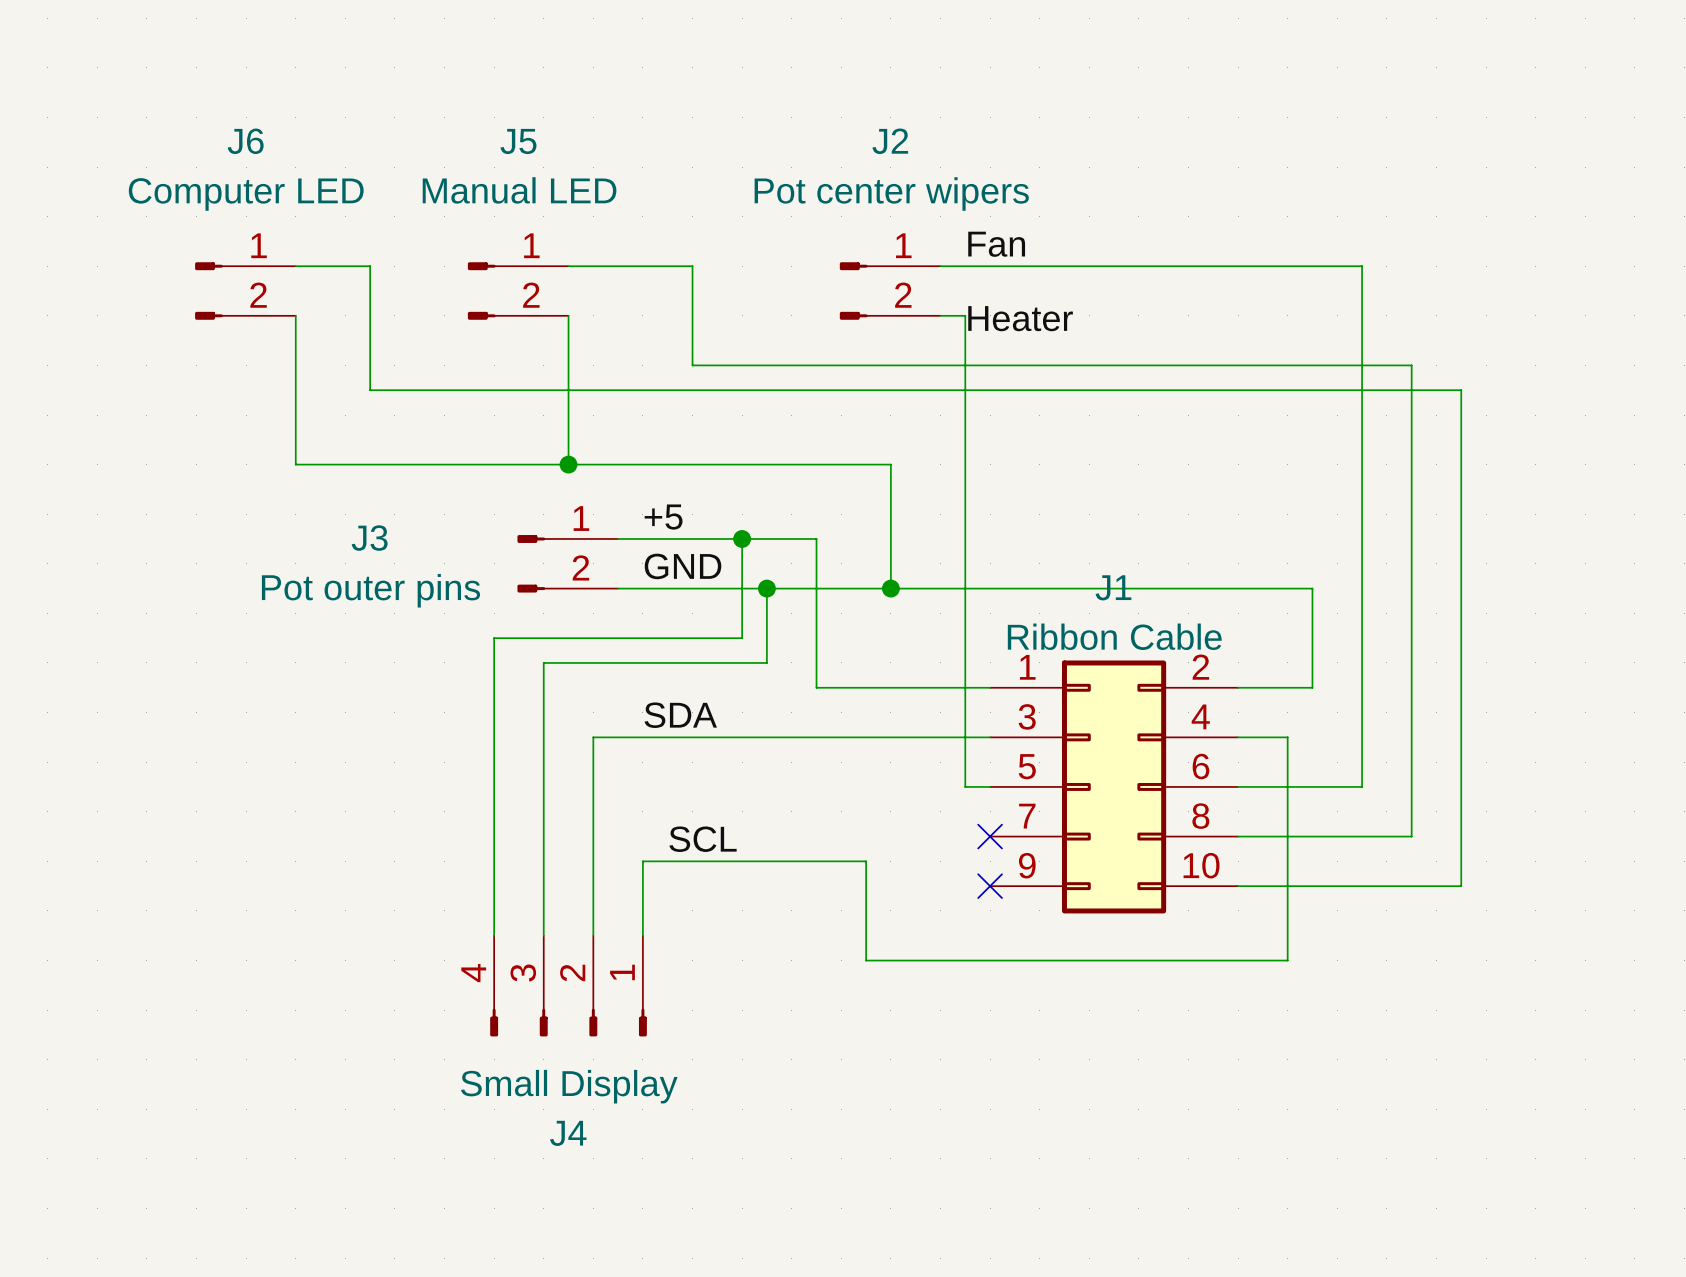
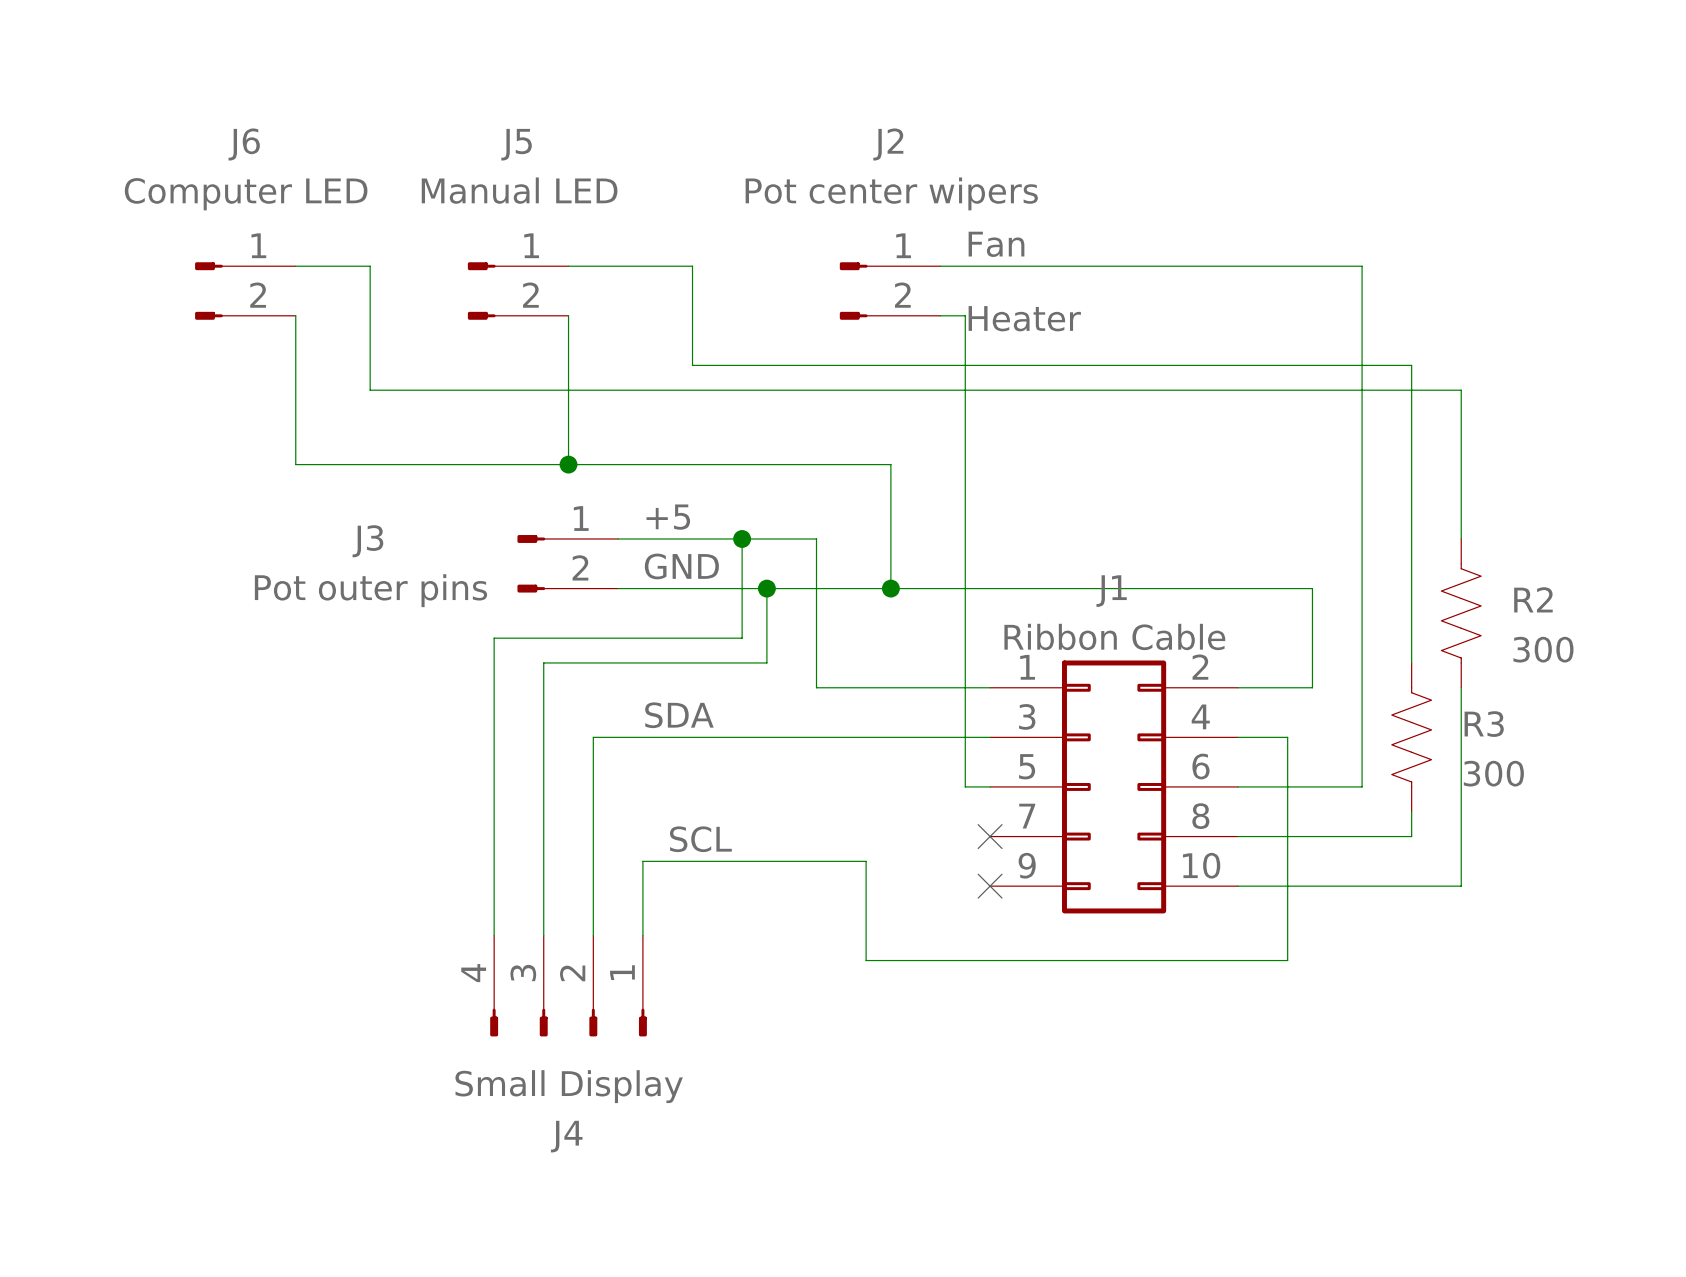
wire: (1461, 538) (1461, 687) -> none
R2: none -> 300 (1461, 613)
wire: (1411, 662) (1411, 811) -> none
R3: none -> 300 (1411, 737)

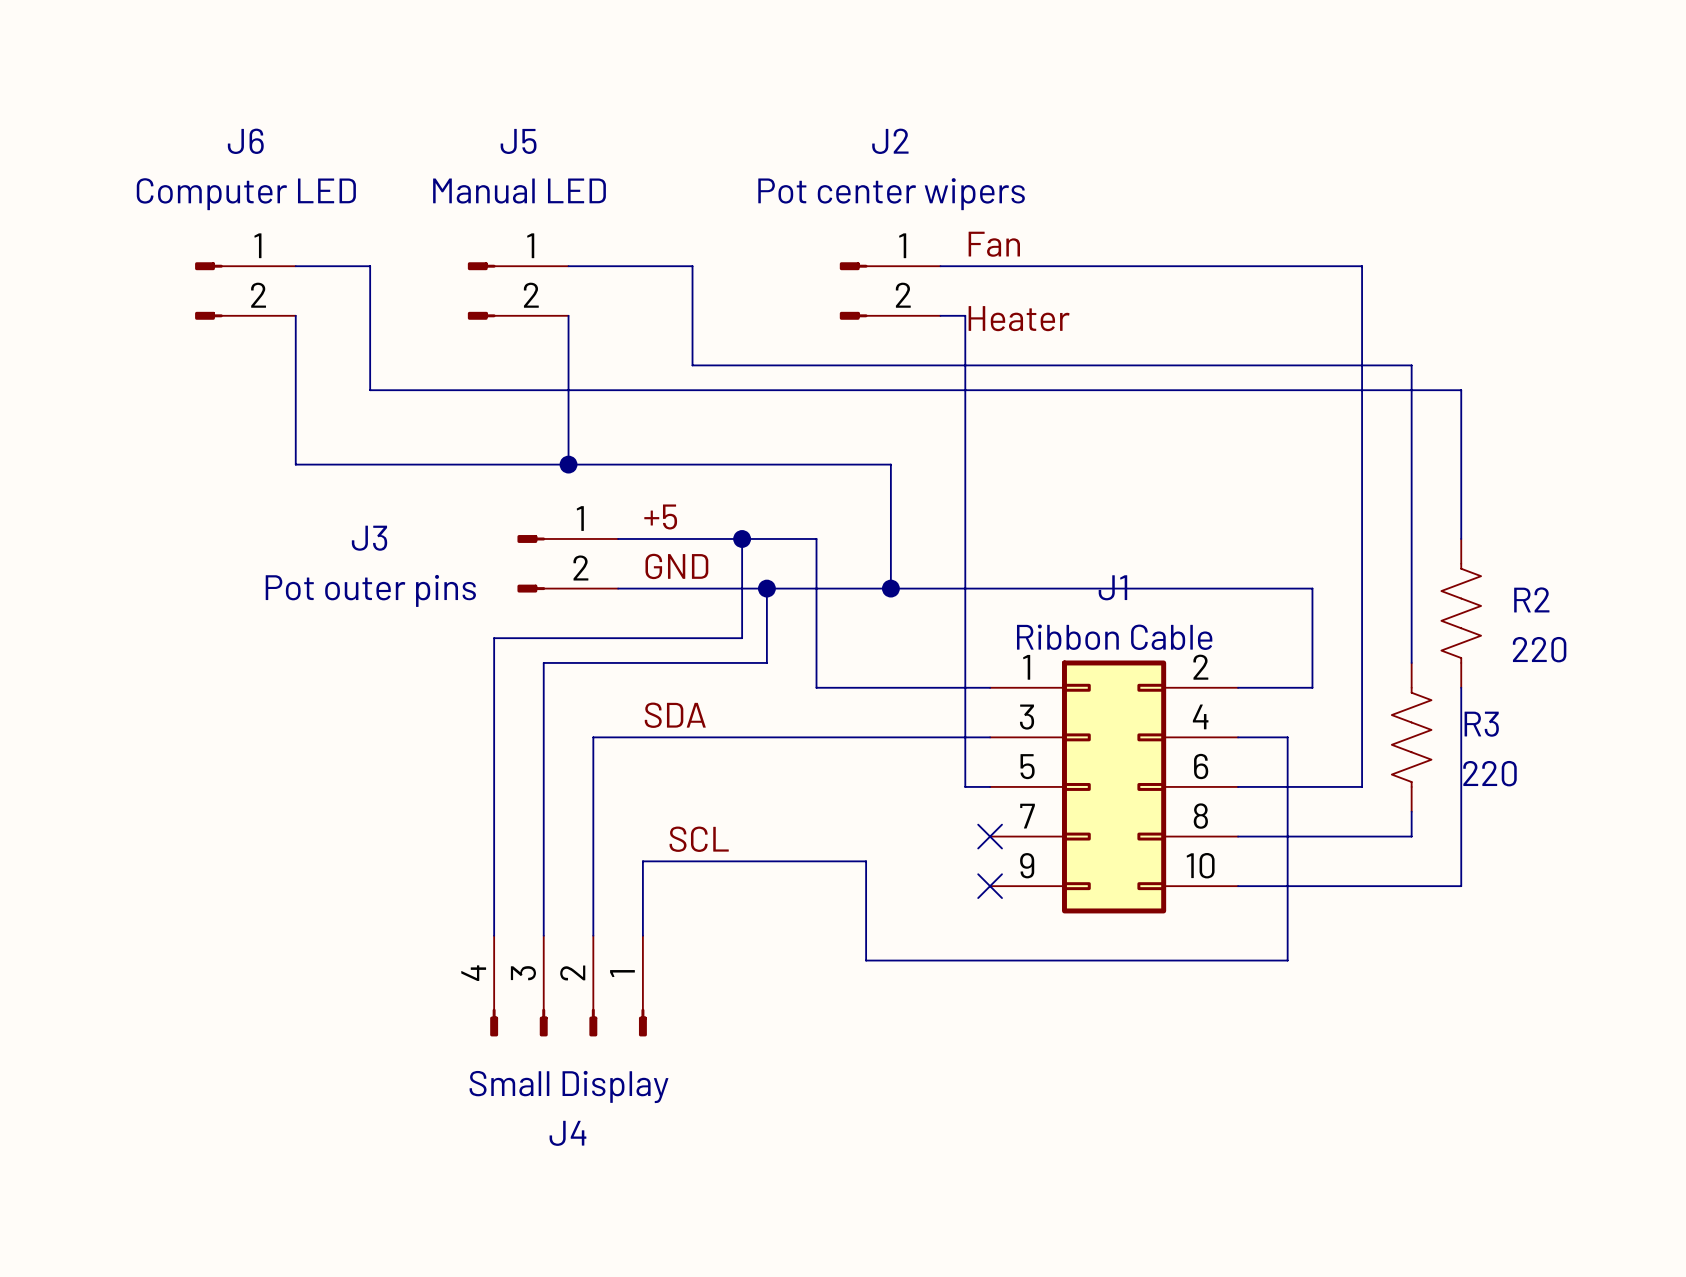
R2 value: 300 (1543, 649) -> 220 (1539, 649)
R3 value: 300 (1493, 773) -> 220 (1489, 773)

